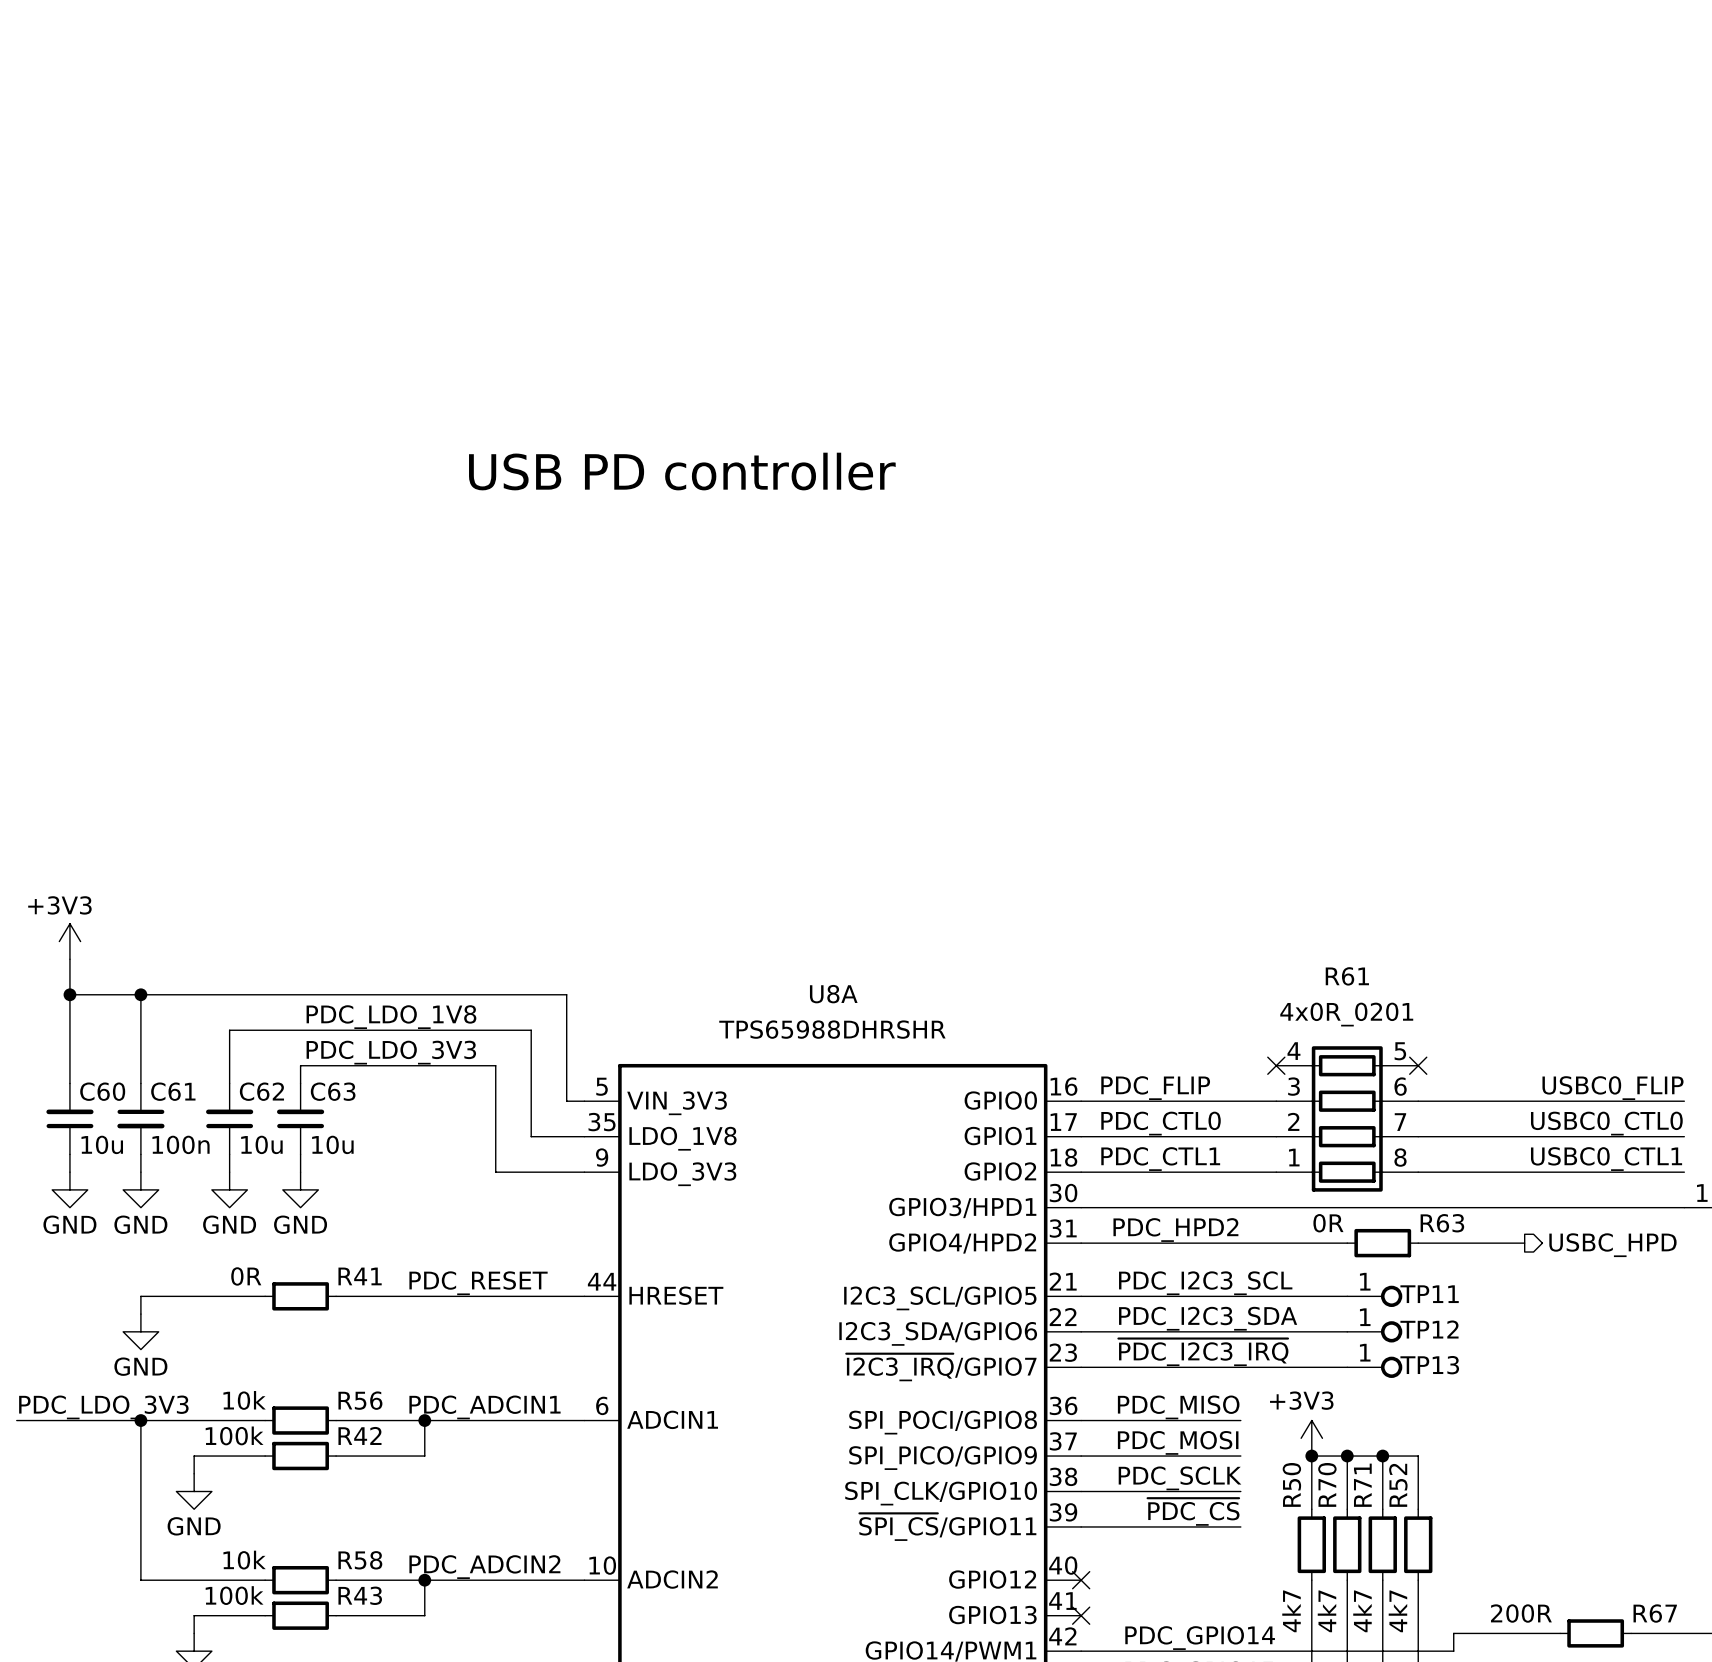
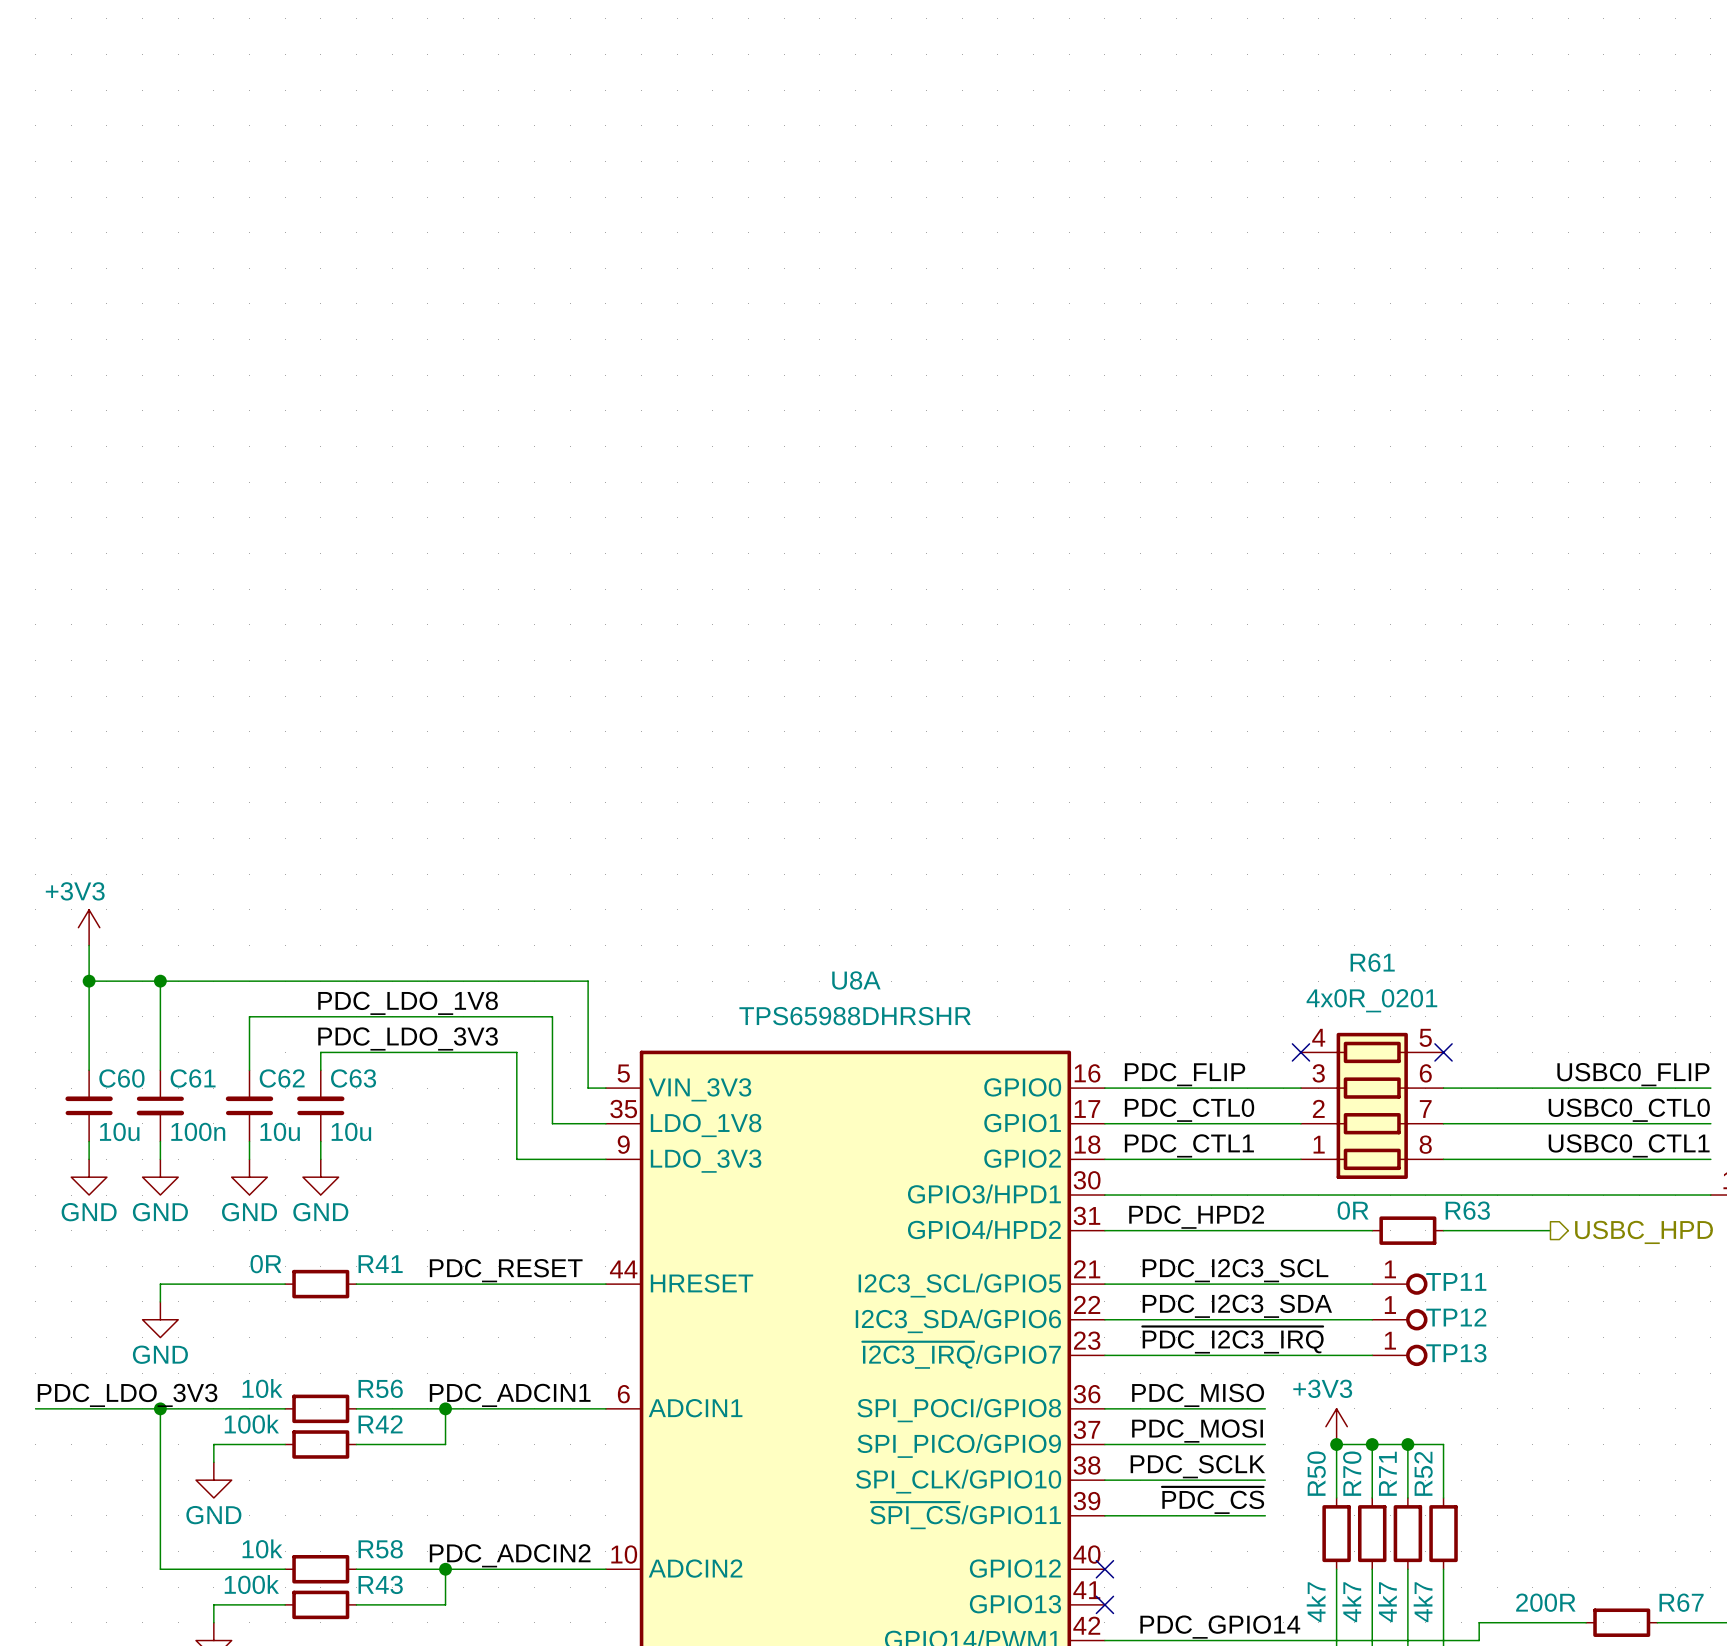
text: USB PD controller (682, 471) -> none

